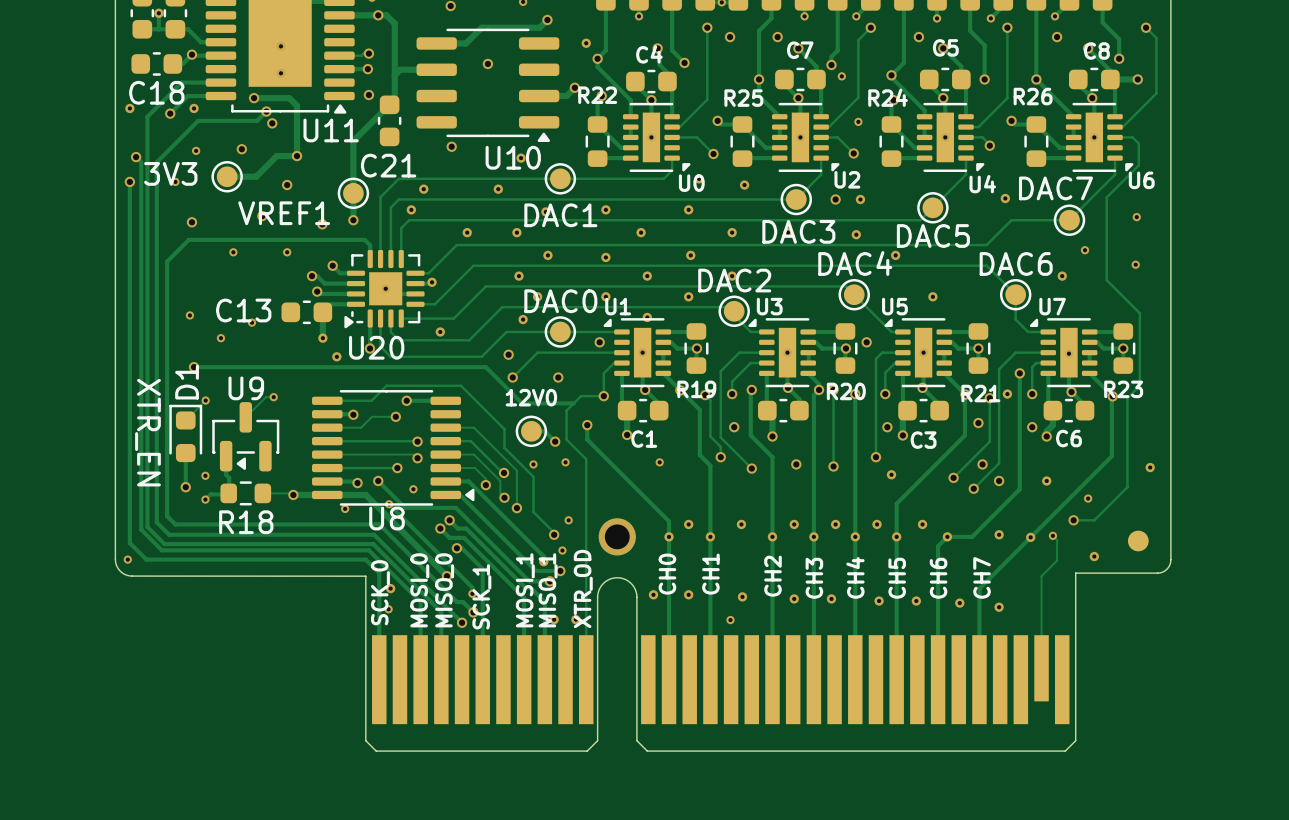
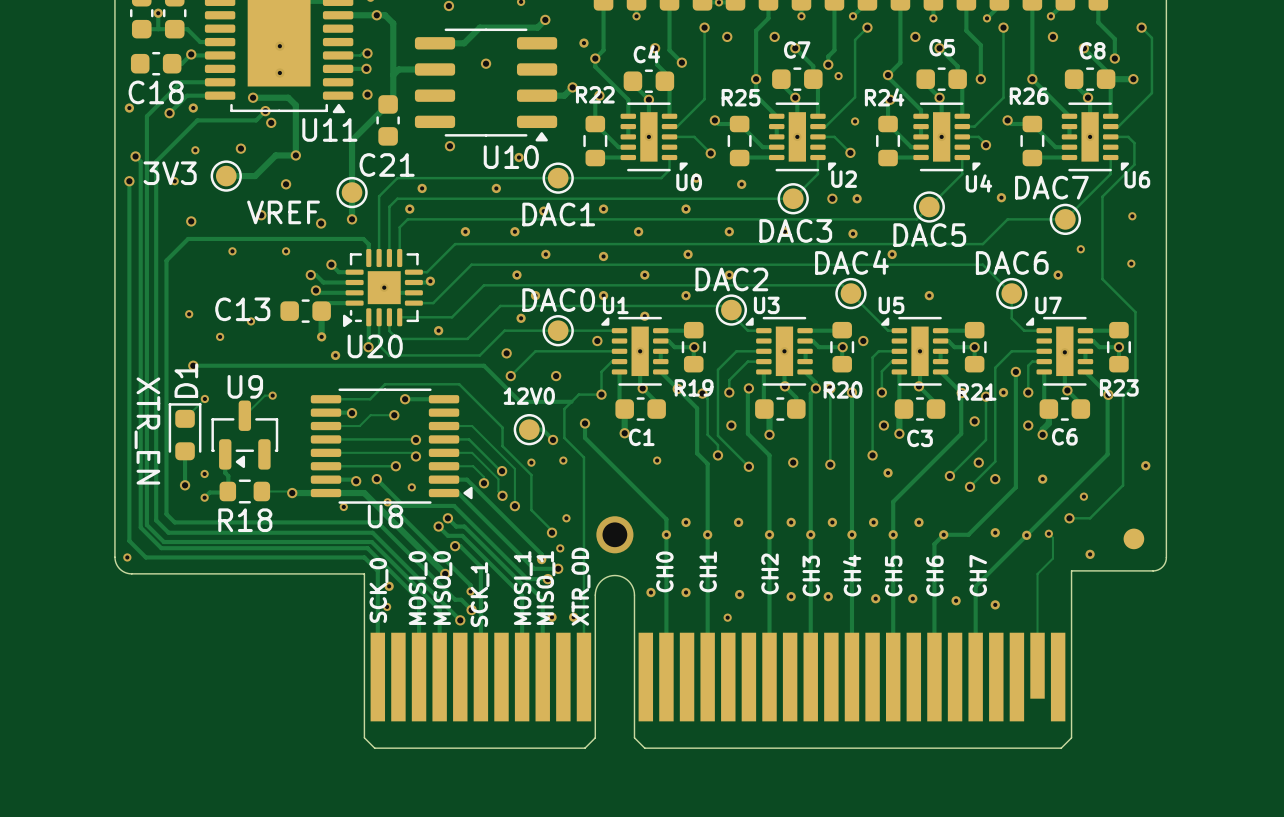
VREF1 name: VREF1 (284, 213) -> VREF (283, 212)

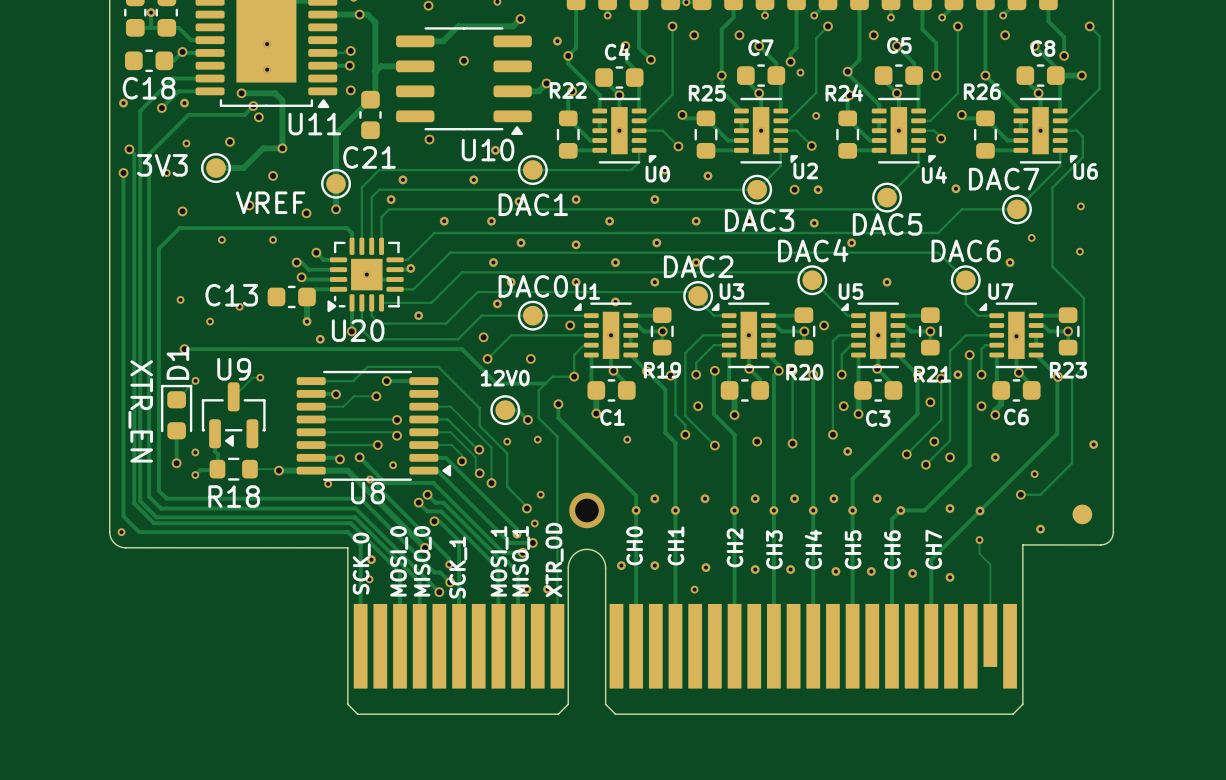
track: (1048, 533) (1052, 537) (1052, 558) (1037, 573) (1037, 591) -> (979, 540) (979, 553) (990, 564)
via position: (1048, 533) -> (979, 540)

